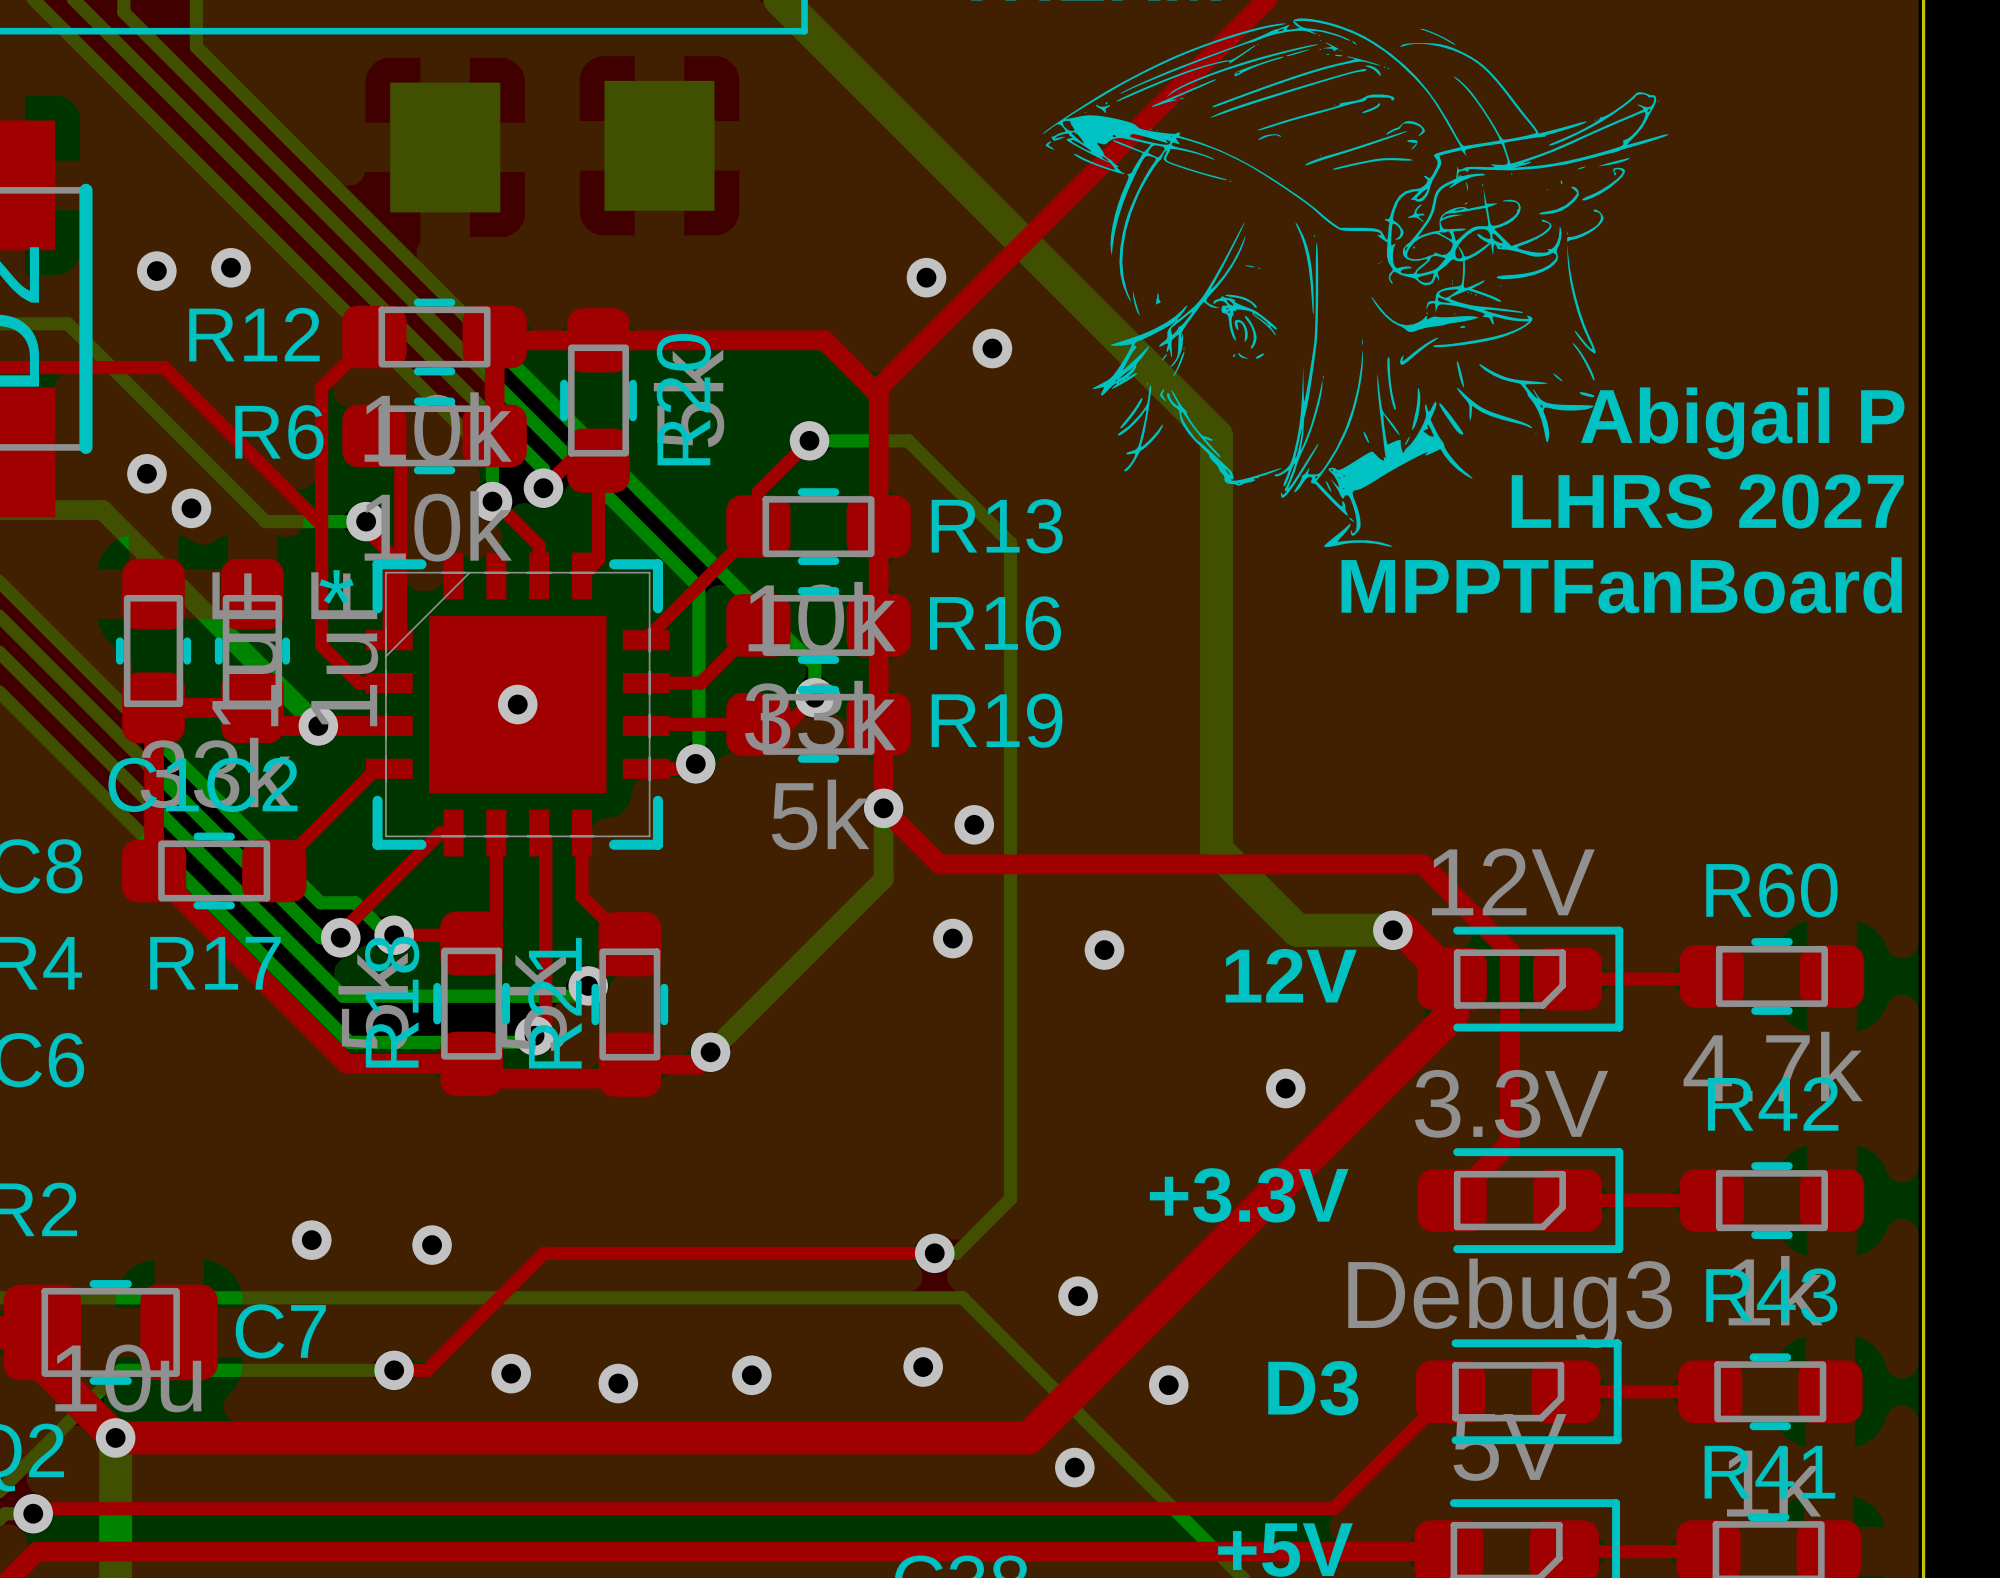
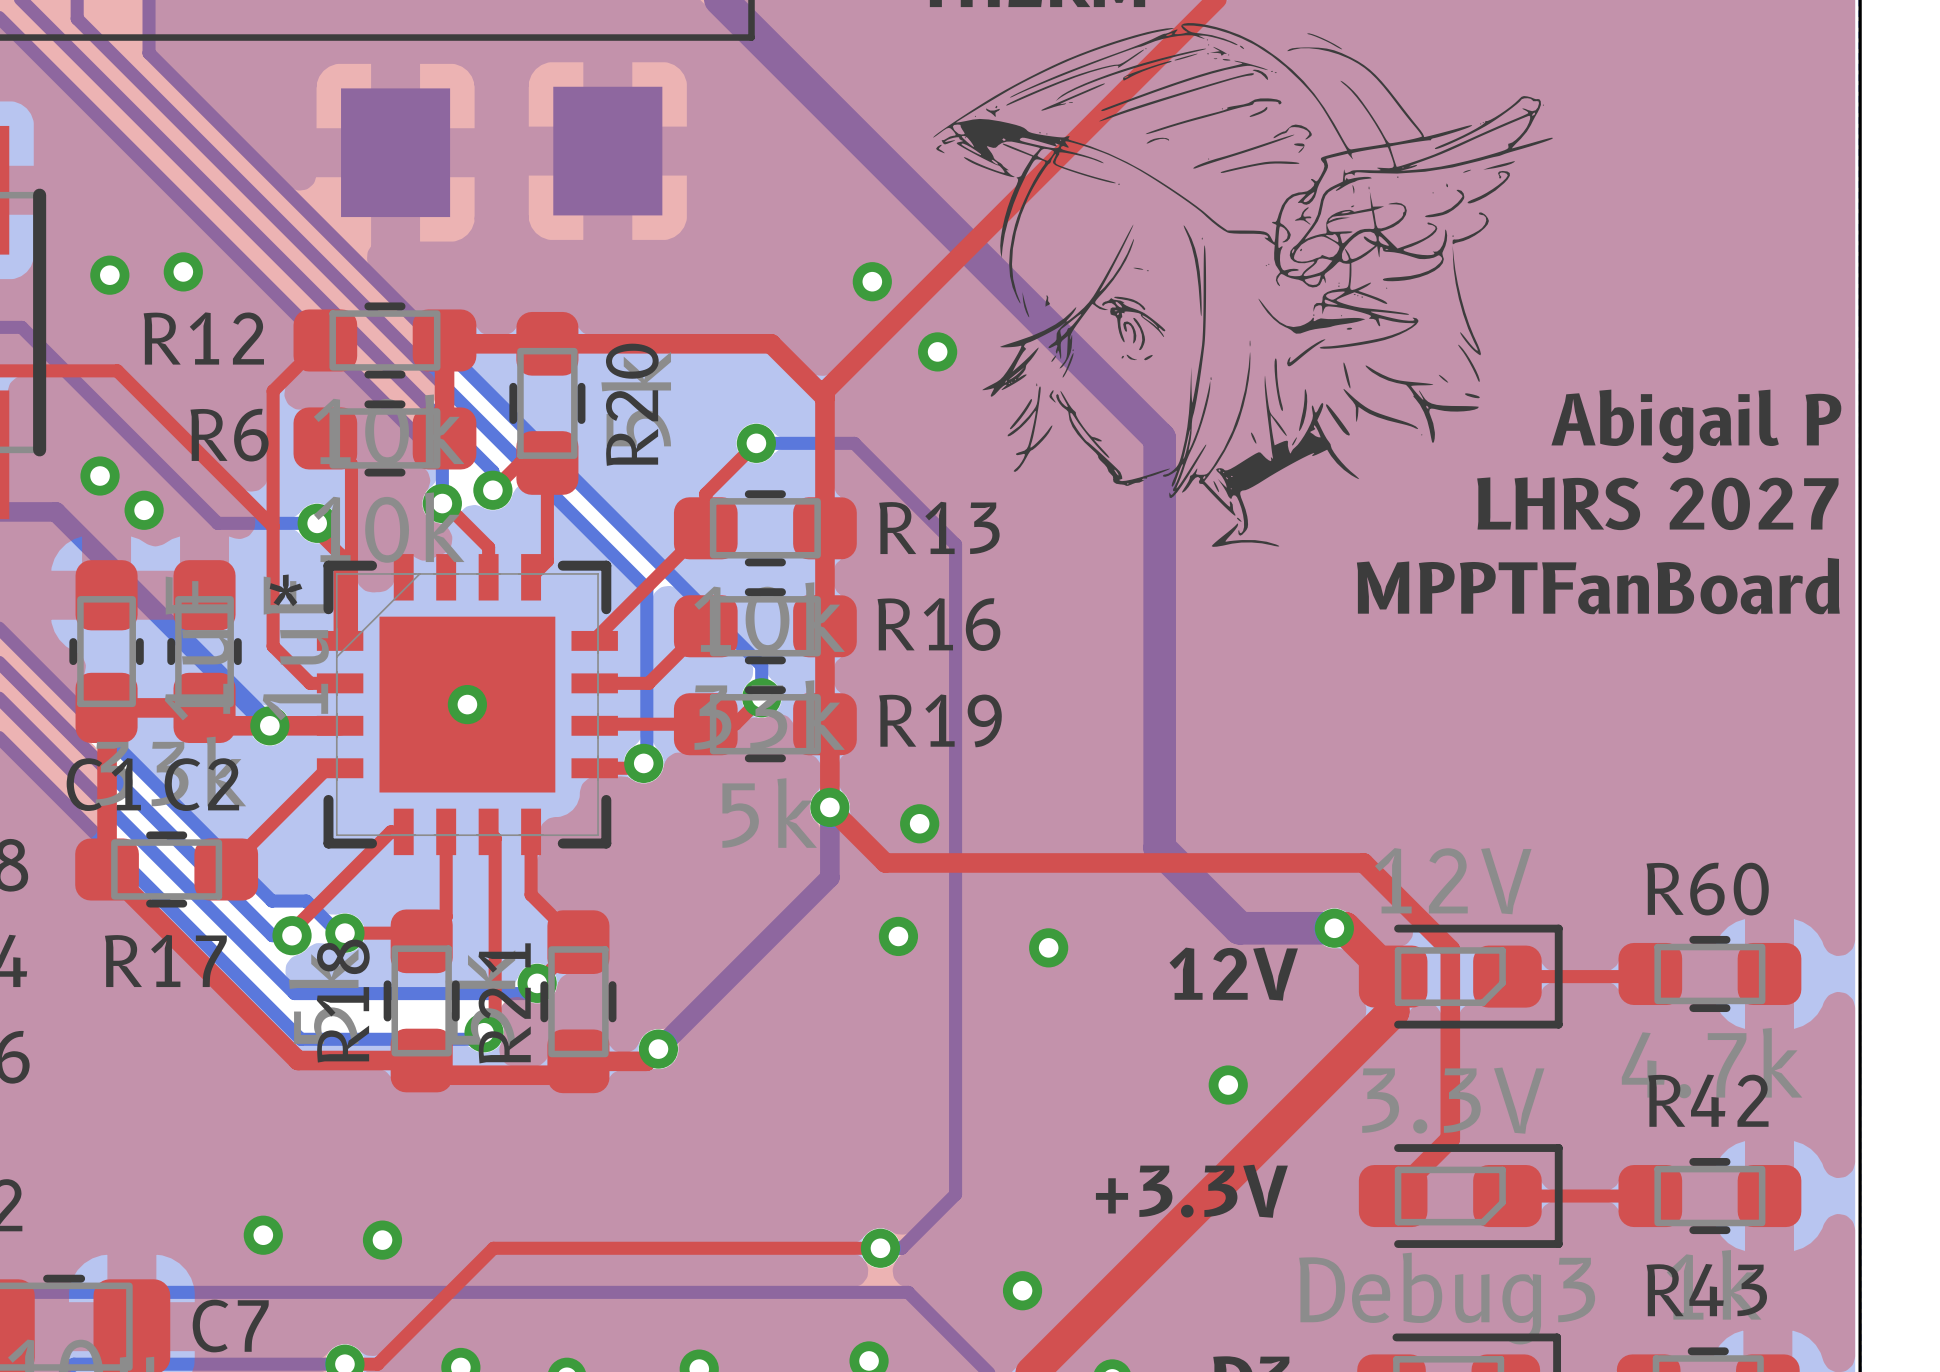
drawing position: (1355, 282) -> (1242, 284)

